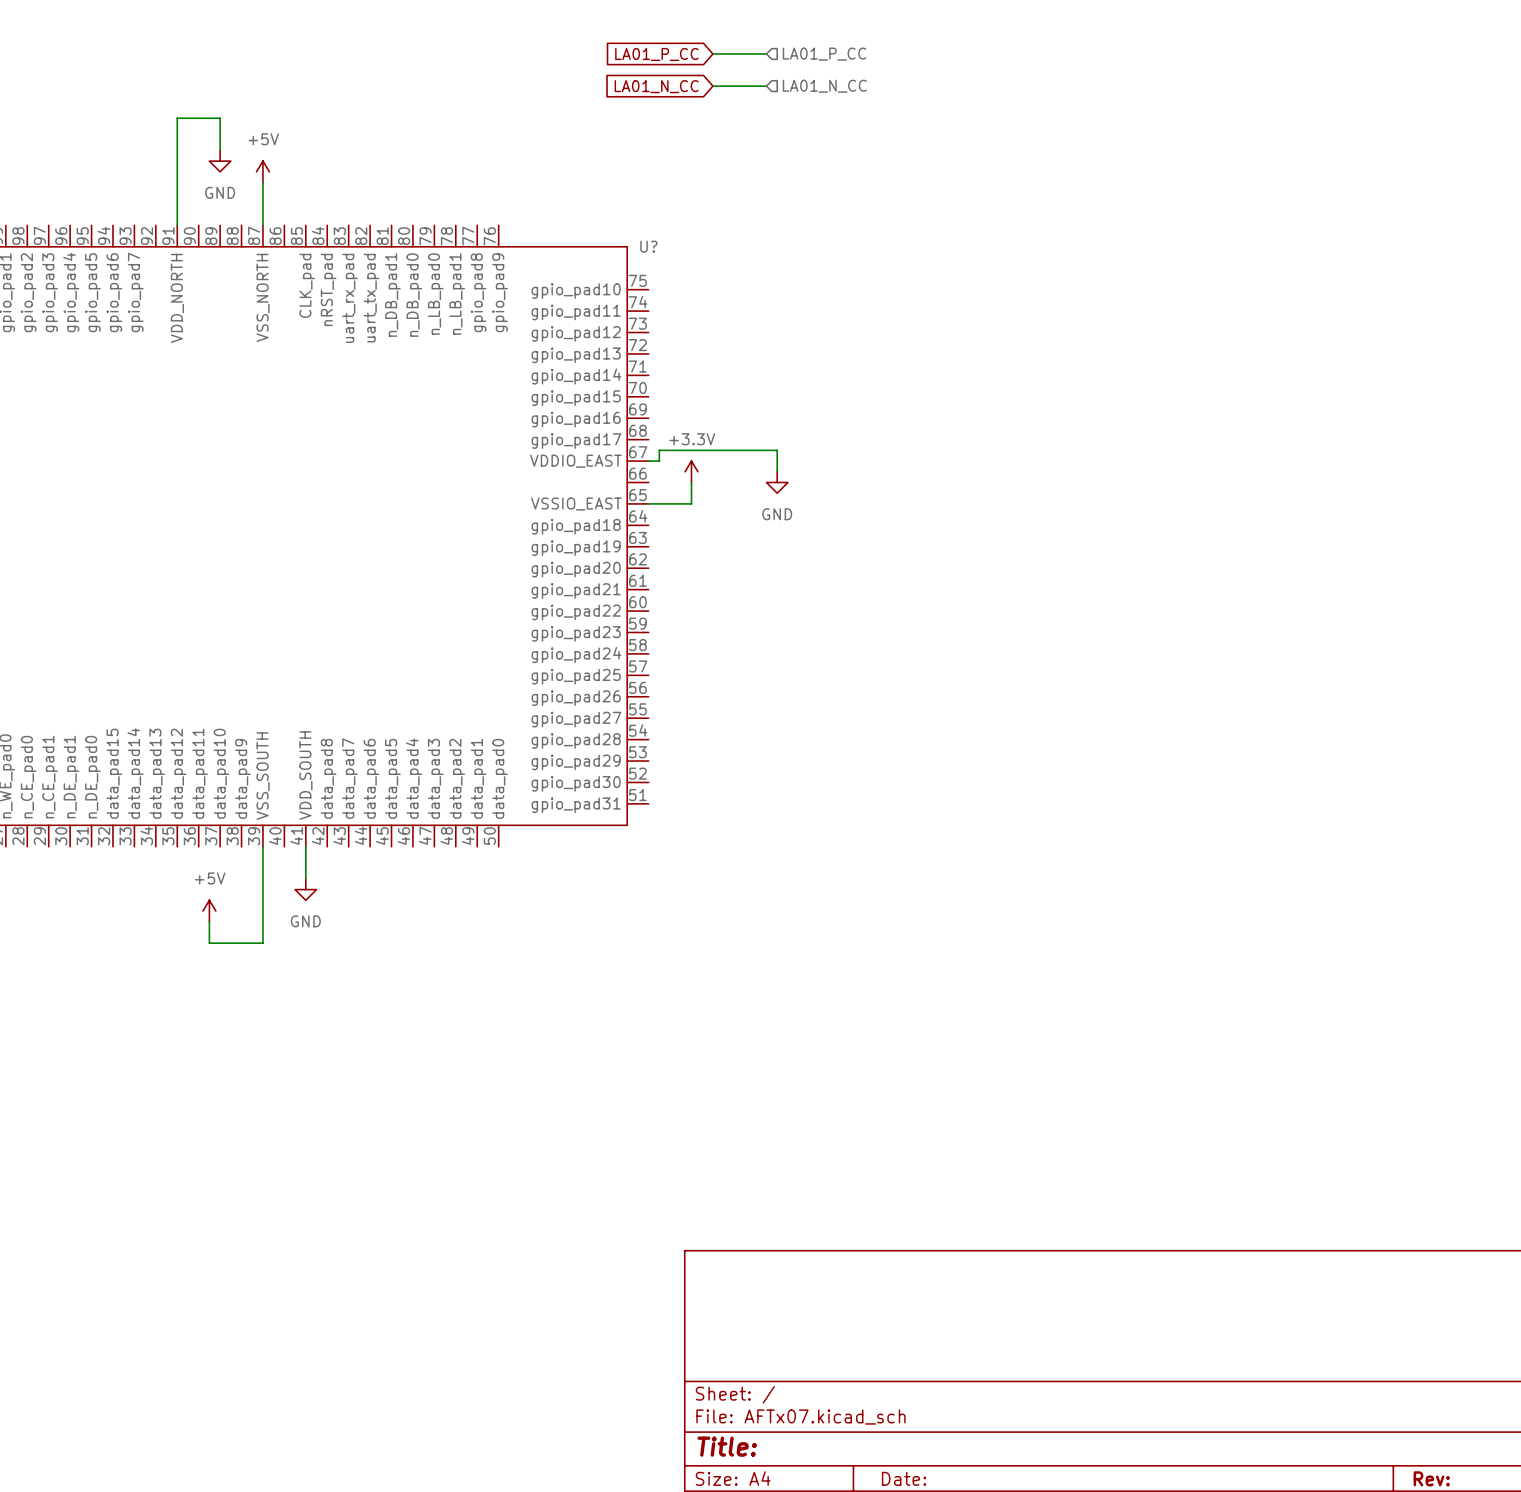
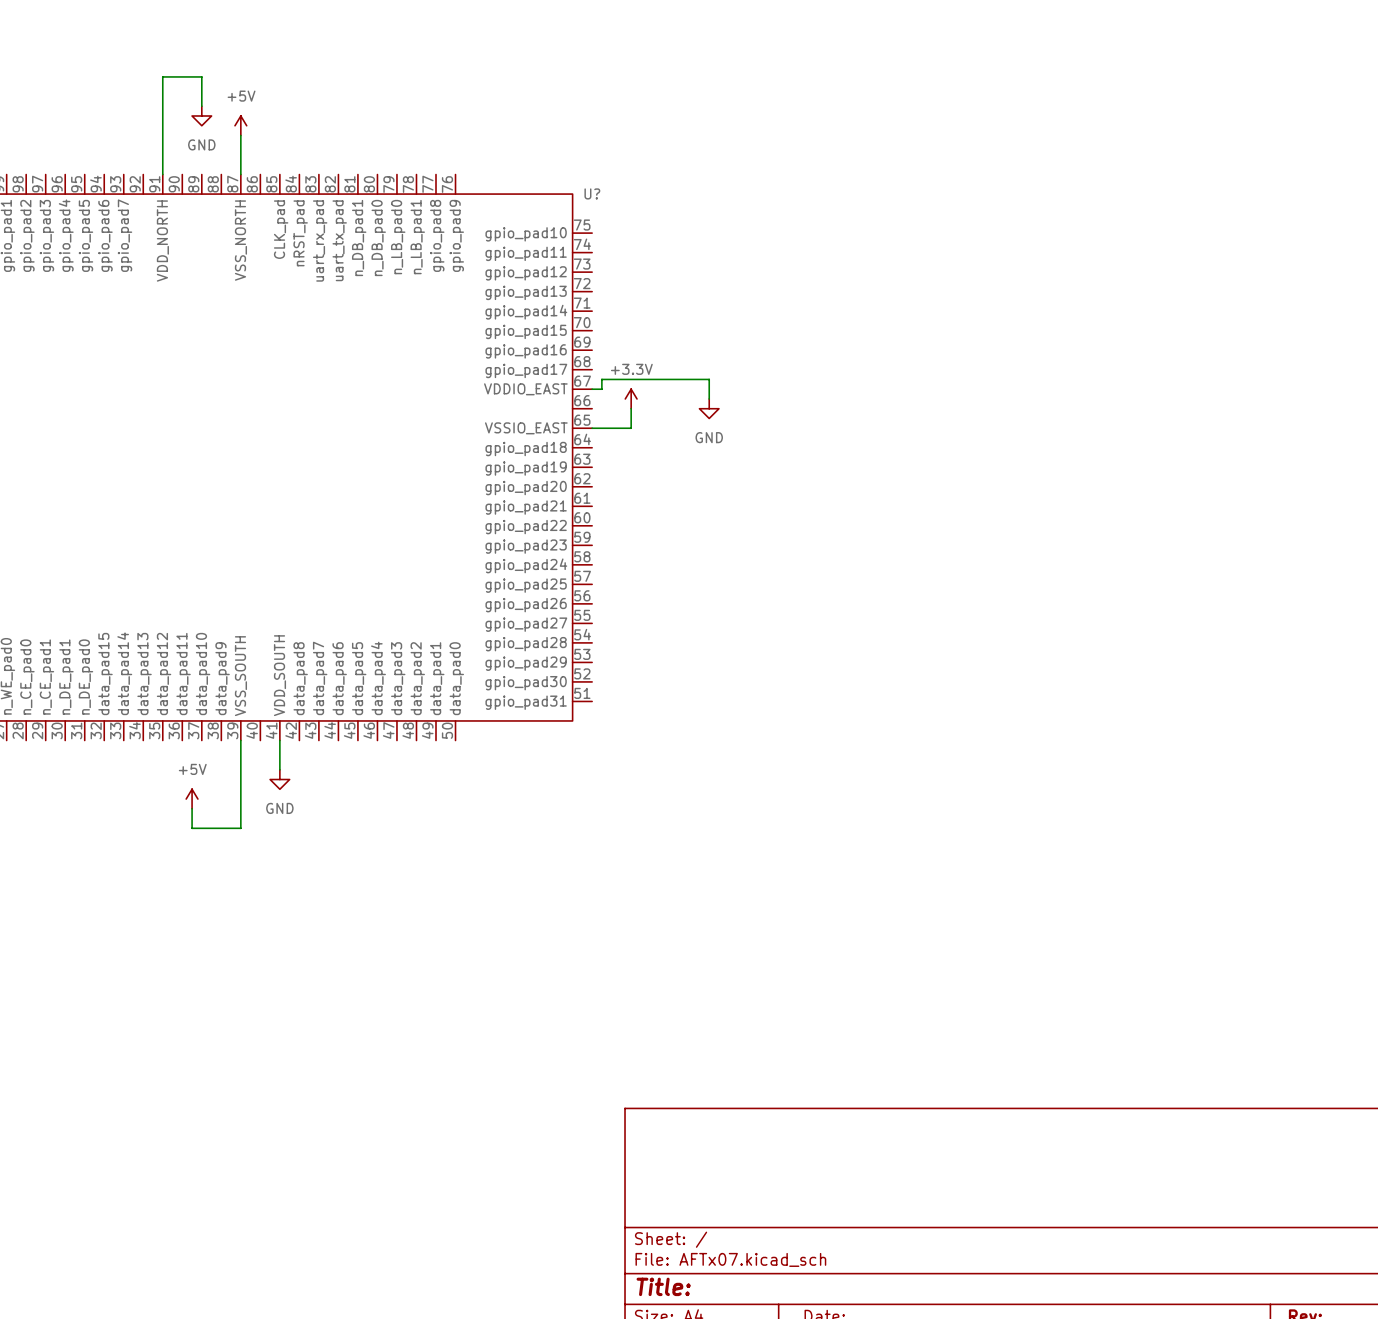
wire: (712, 53) (766, 53) -> none
global label: LA01_P_CC (656, 54) -> none
hierarchical label: LA01_P_CC (824, 54) -> none
global label: LA01_N_CC (656, 86) -> none
wire: (712, 86) (766, 86) -> none
hierarchical label: LA01_N_CC (824, 86) -> none

